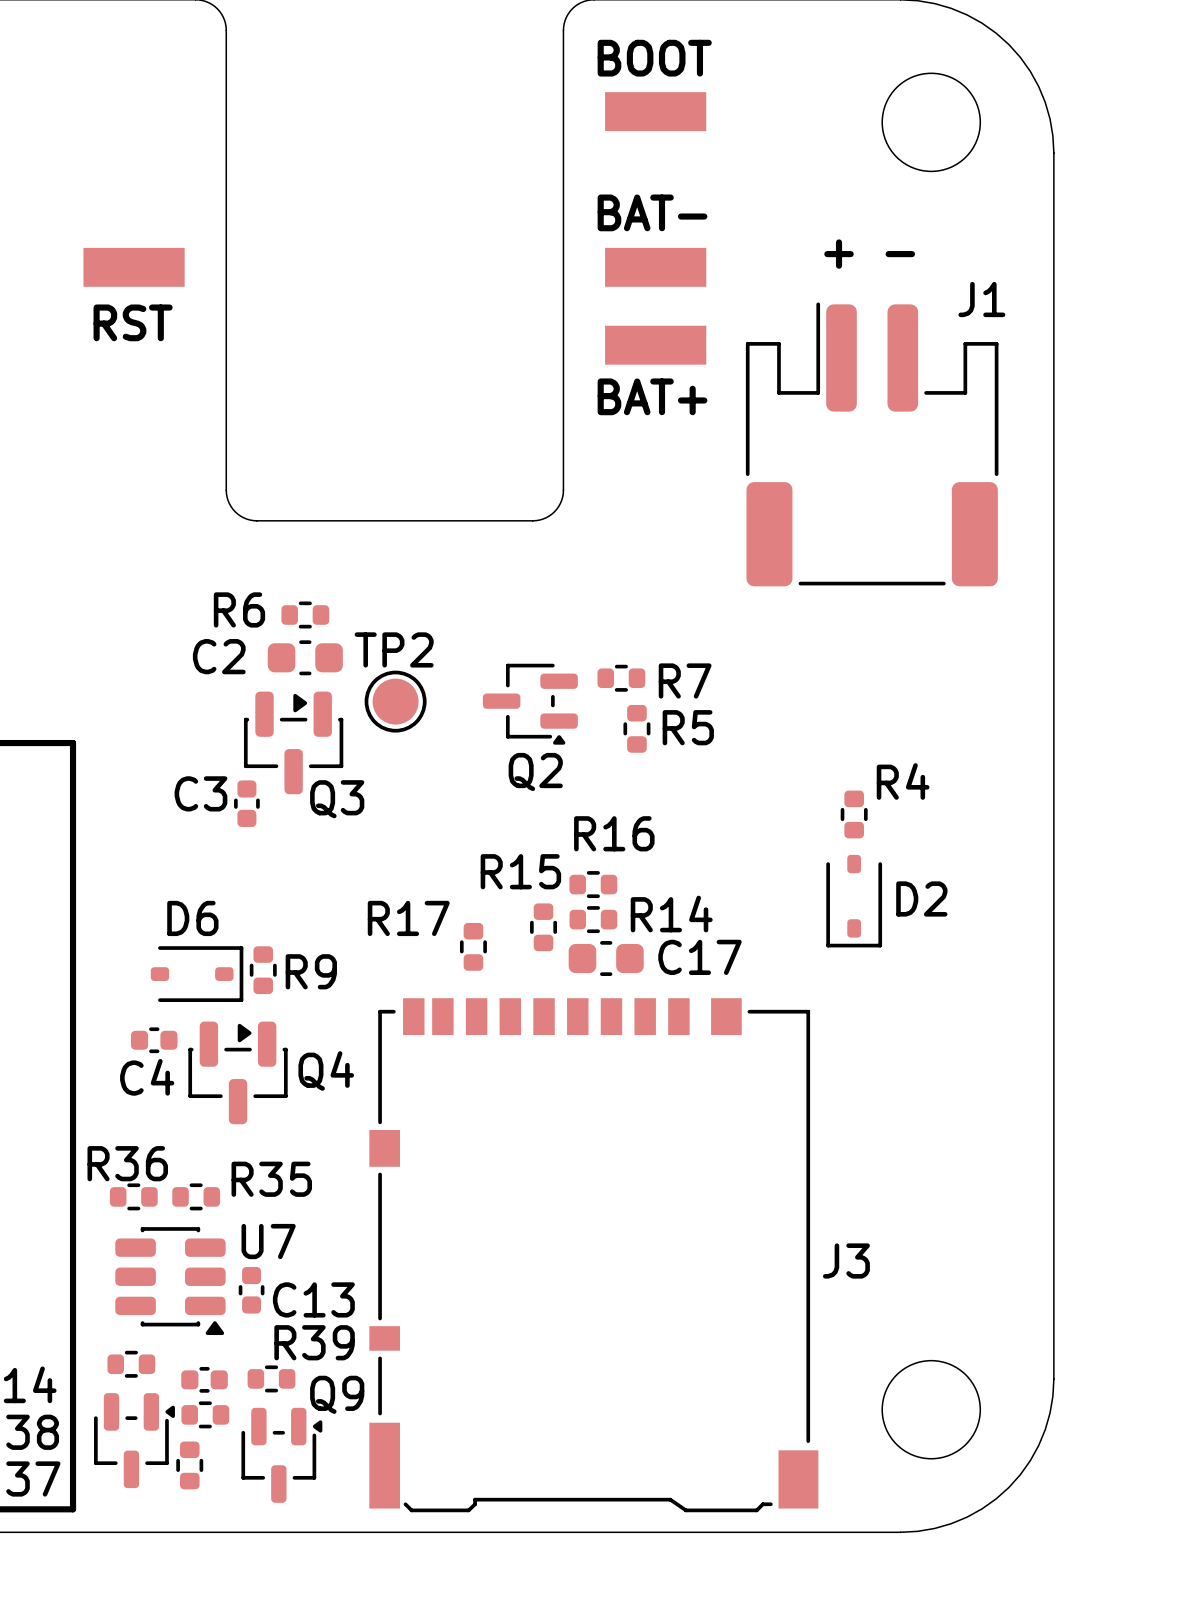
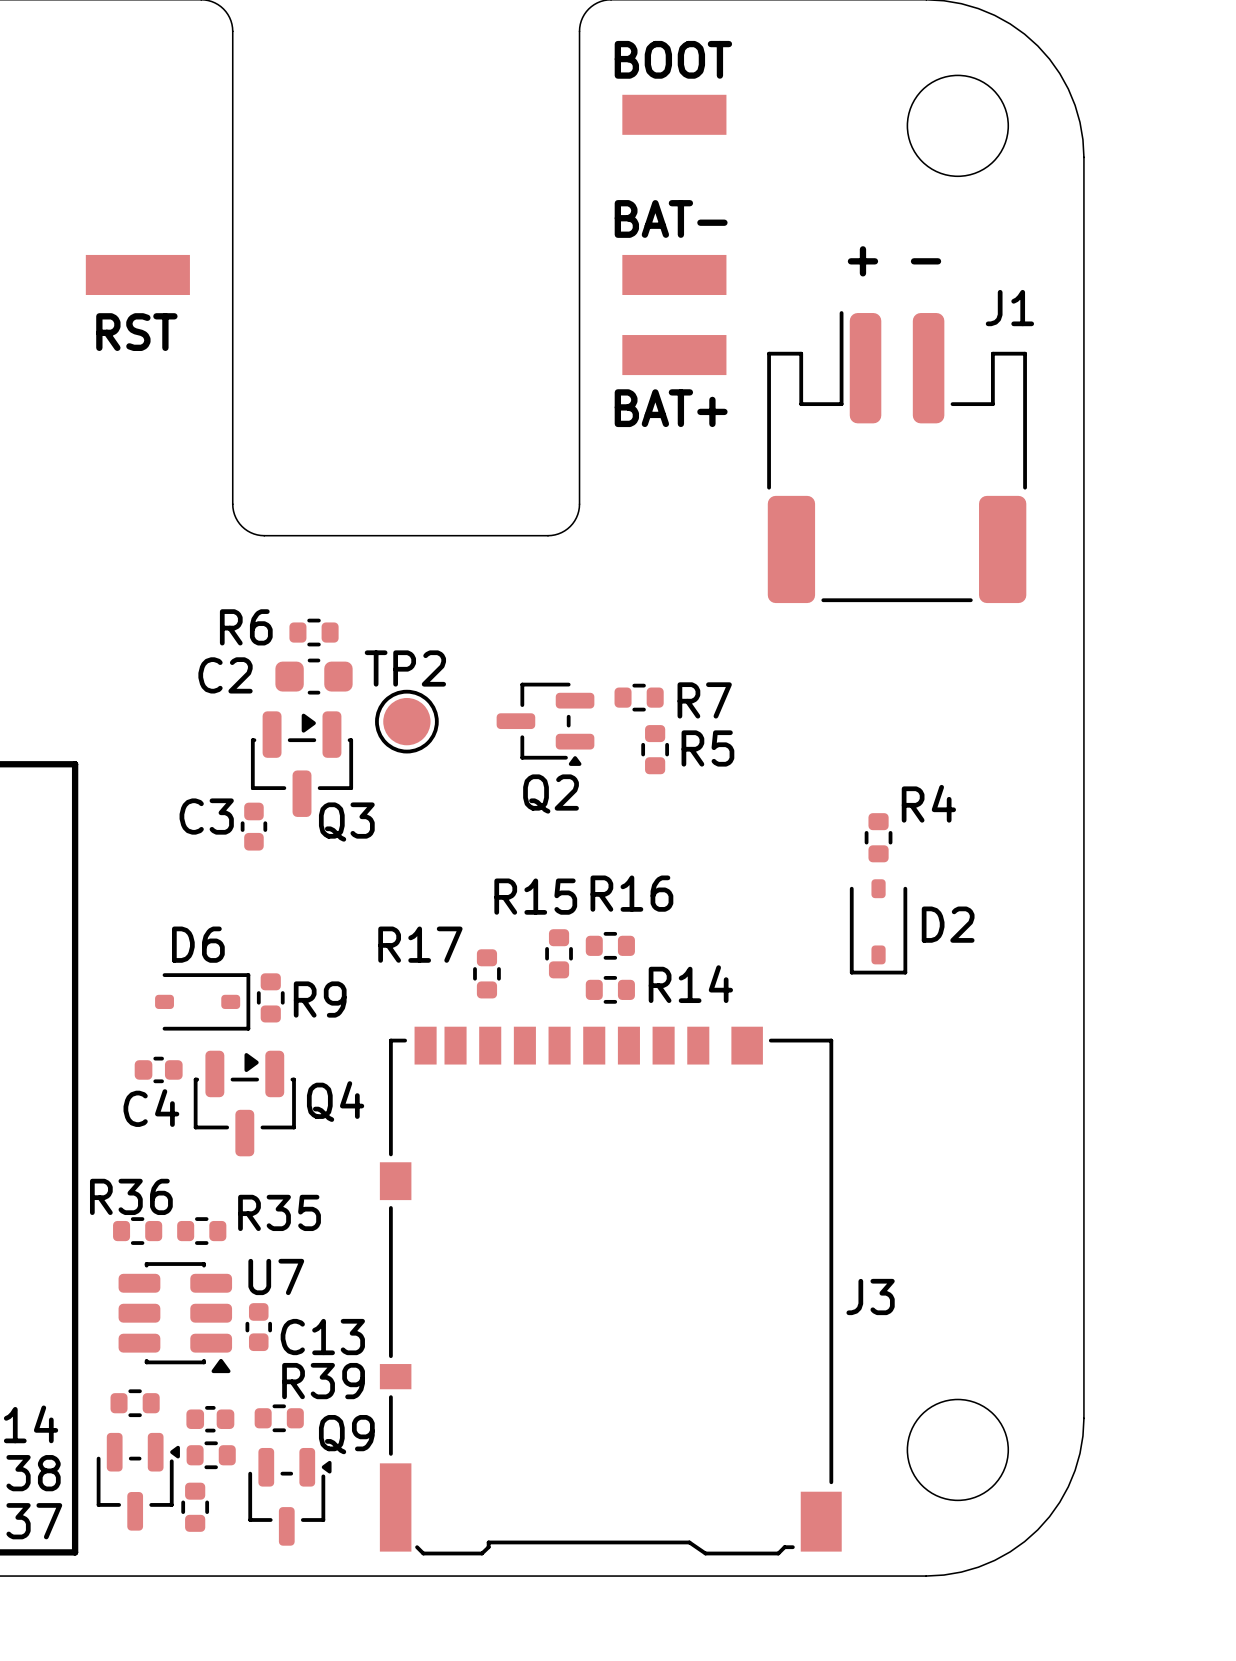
R16: (593, 884) -> none
R14 name: R14 (671, 914) -> R16 (631, 893)
C17: (606, 958) -> none
R14: none -> (610, 989)

